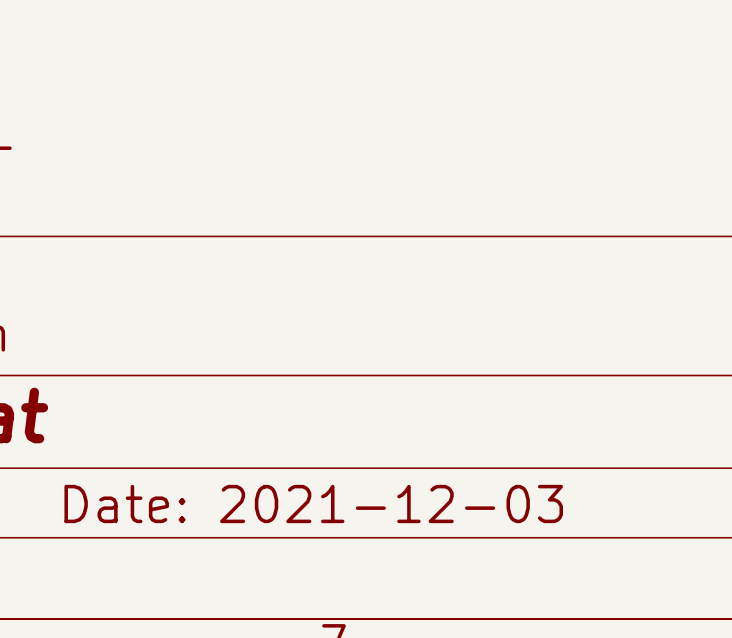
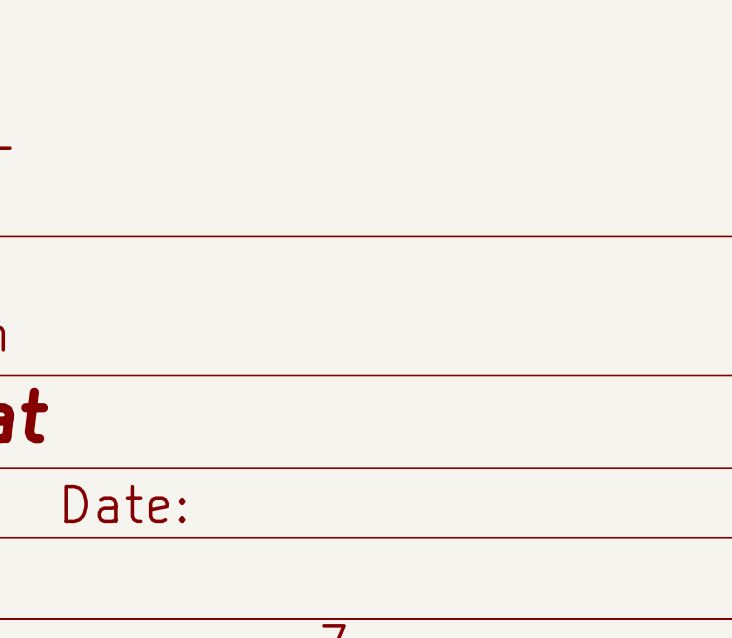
title block: Date: 2021-12-03 (313, 504) -> Date: (124, 504)

